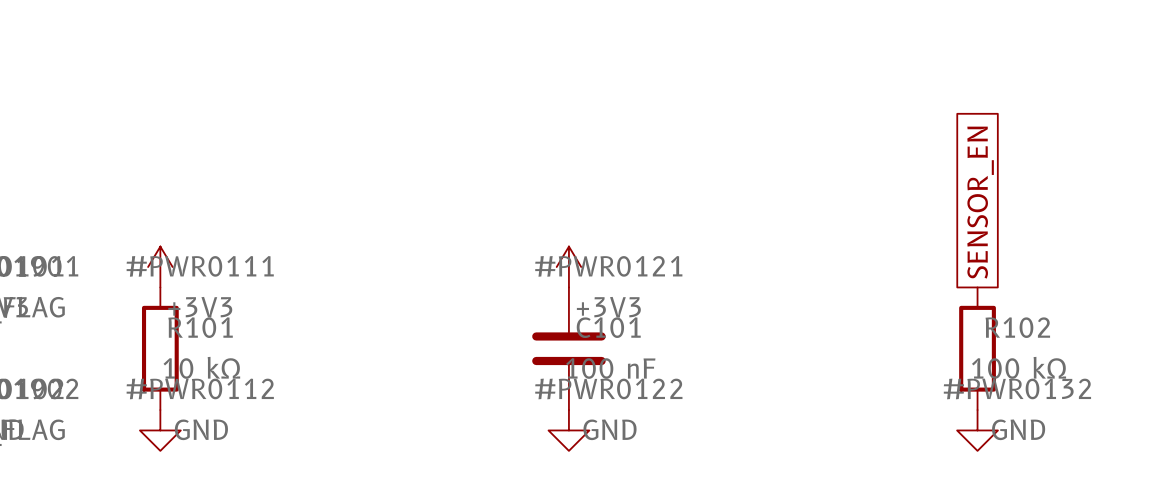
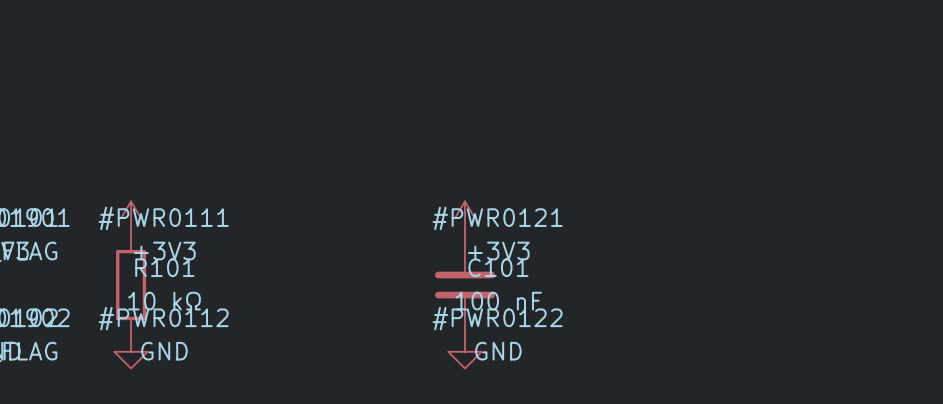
global label: SENSOR_EN (980, 202) -> none
R102: 100 kΩ (977, 348) -> none
#PWR0132: GND (977, 430) -> none

